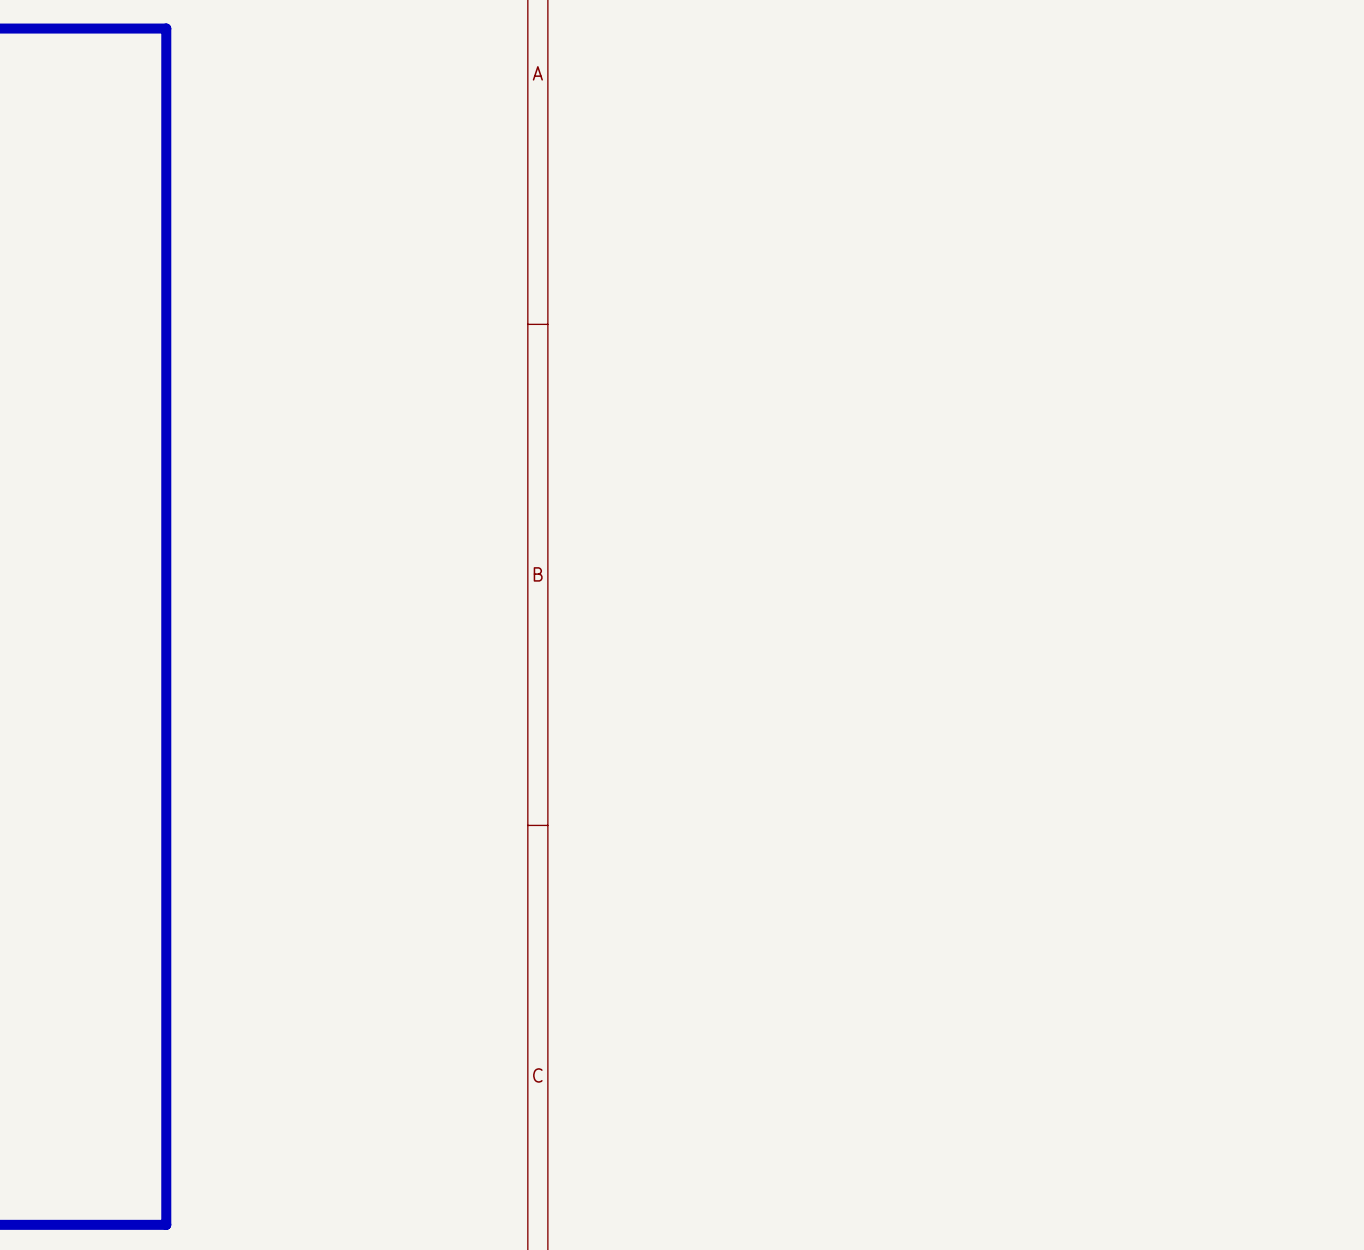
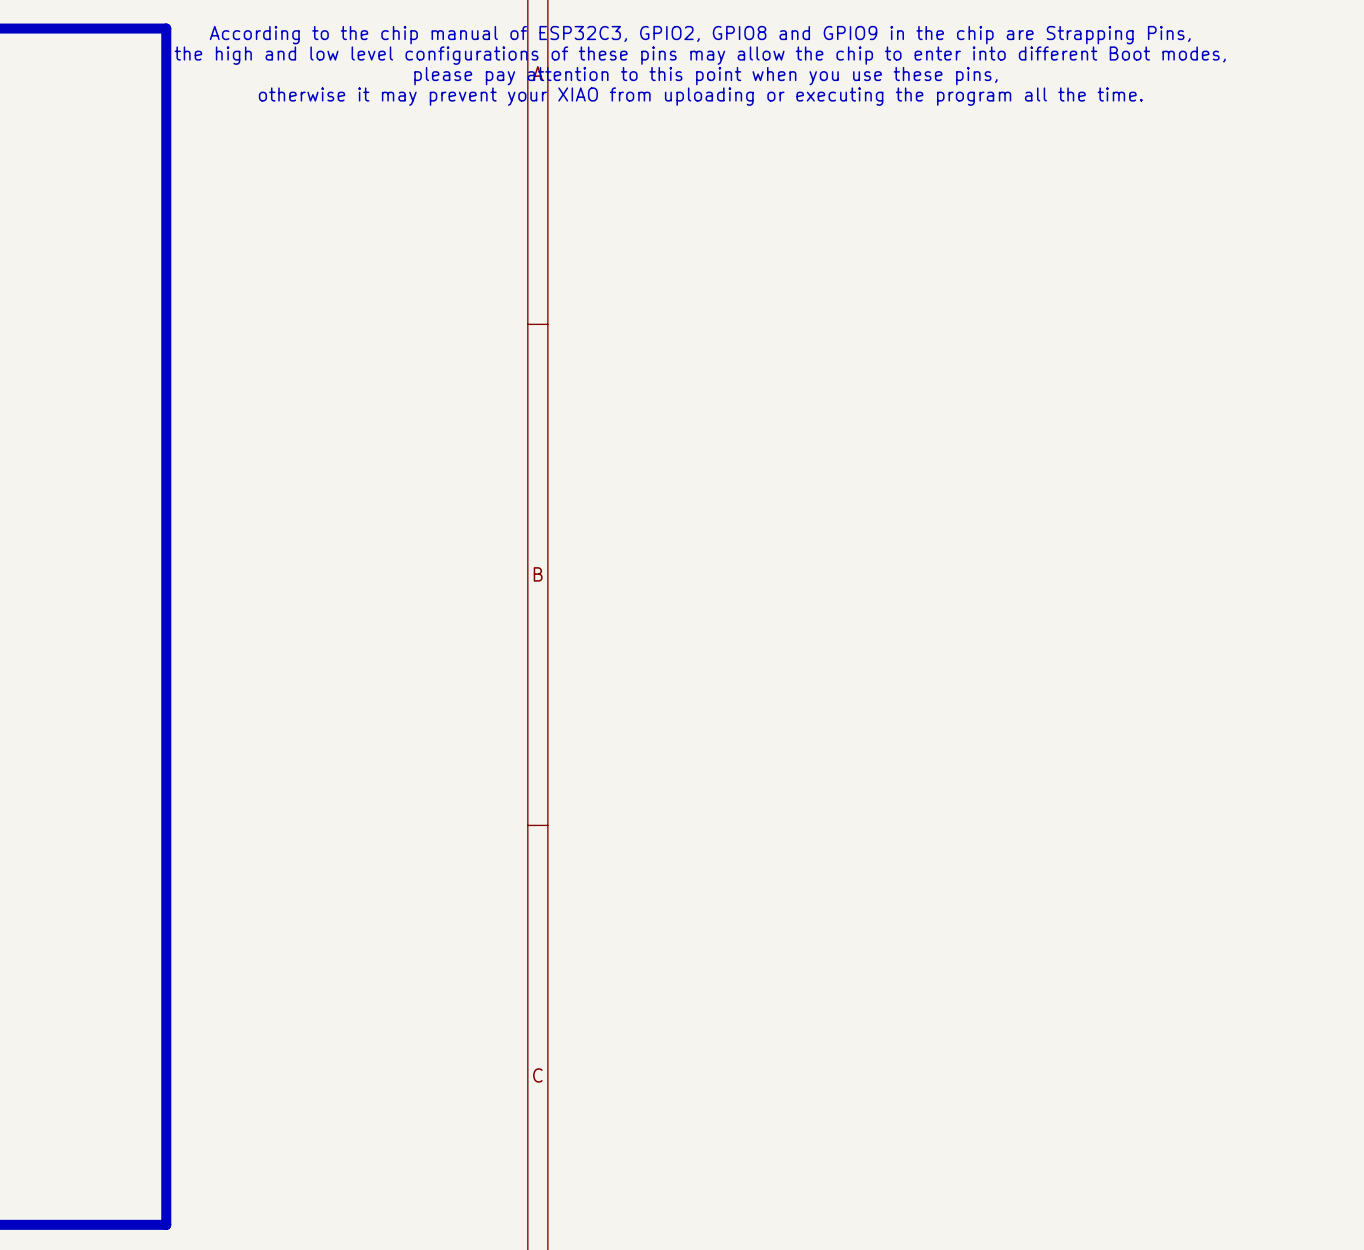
text: none -> According to the chip manual of ESP32C3, GPIO2, GPIO8 and GPIO9 in the chip are Strapping Pins, (700, 35)
text: none -> the high and low level configurations of these pins may allow the chip to enter into different Boot modes, (700, 55)
text: none -> please pay attention to this point when you use these pins, (705, 76)
text: none -> otherwise it may prevent your XIAO from uploading or executing the program all the time. (700, 96)

